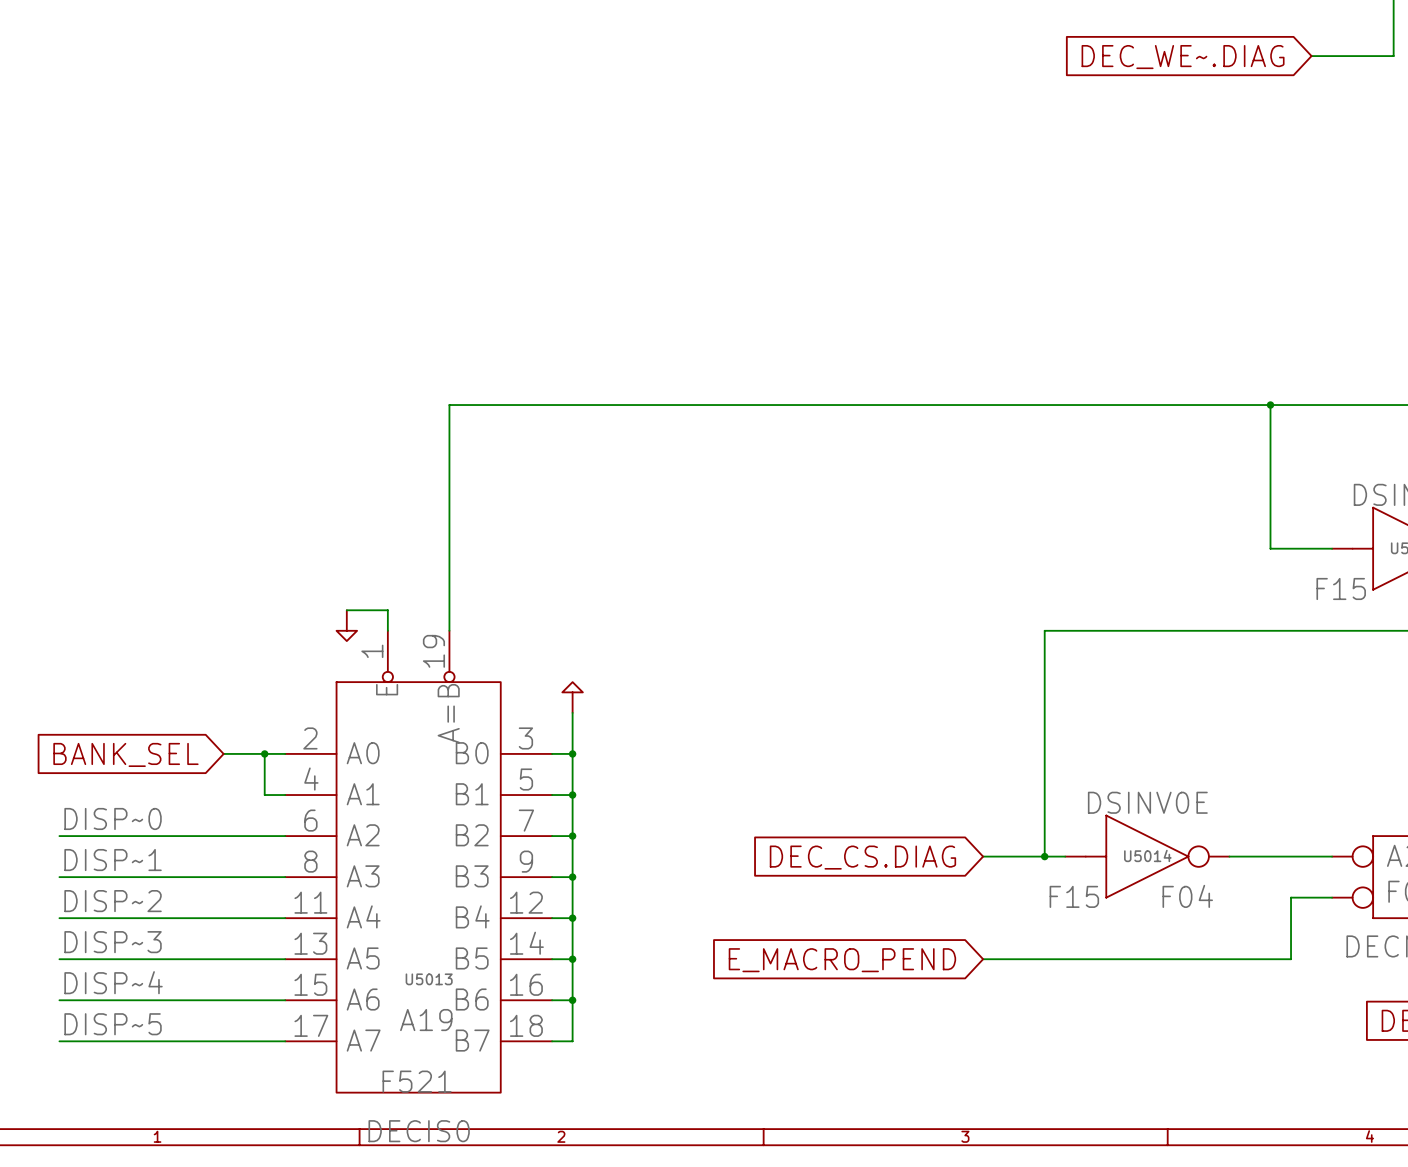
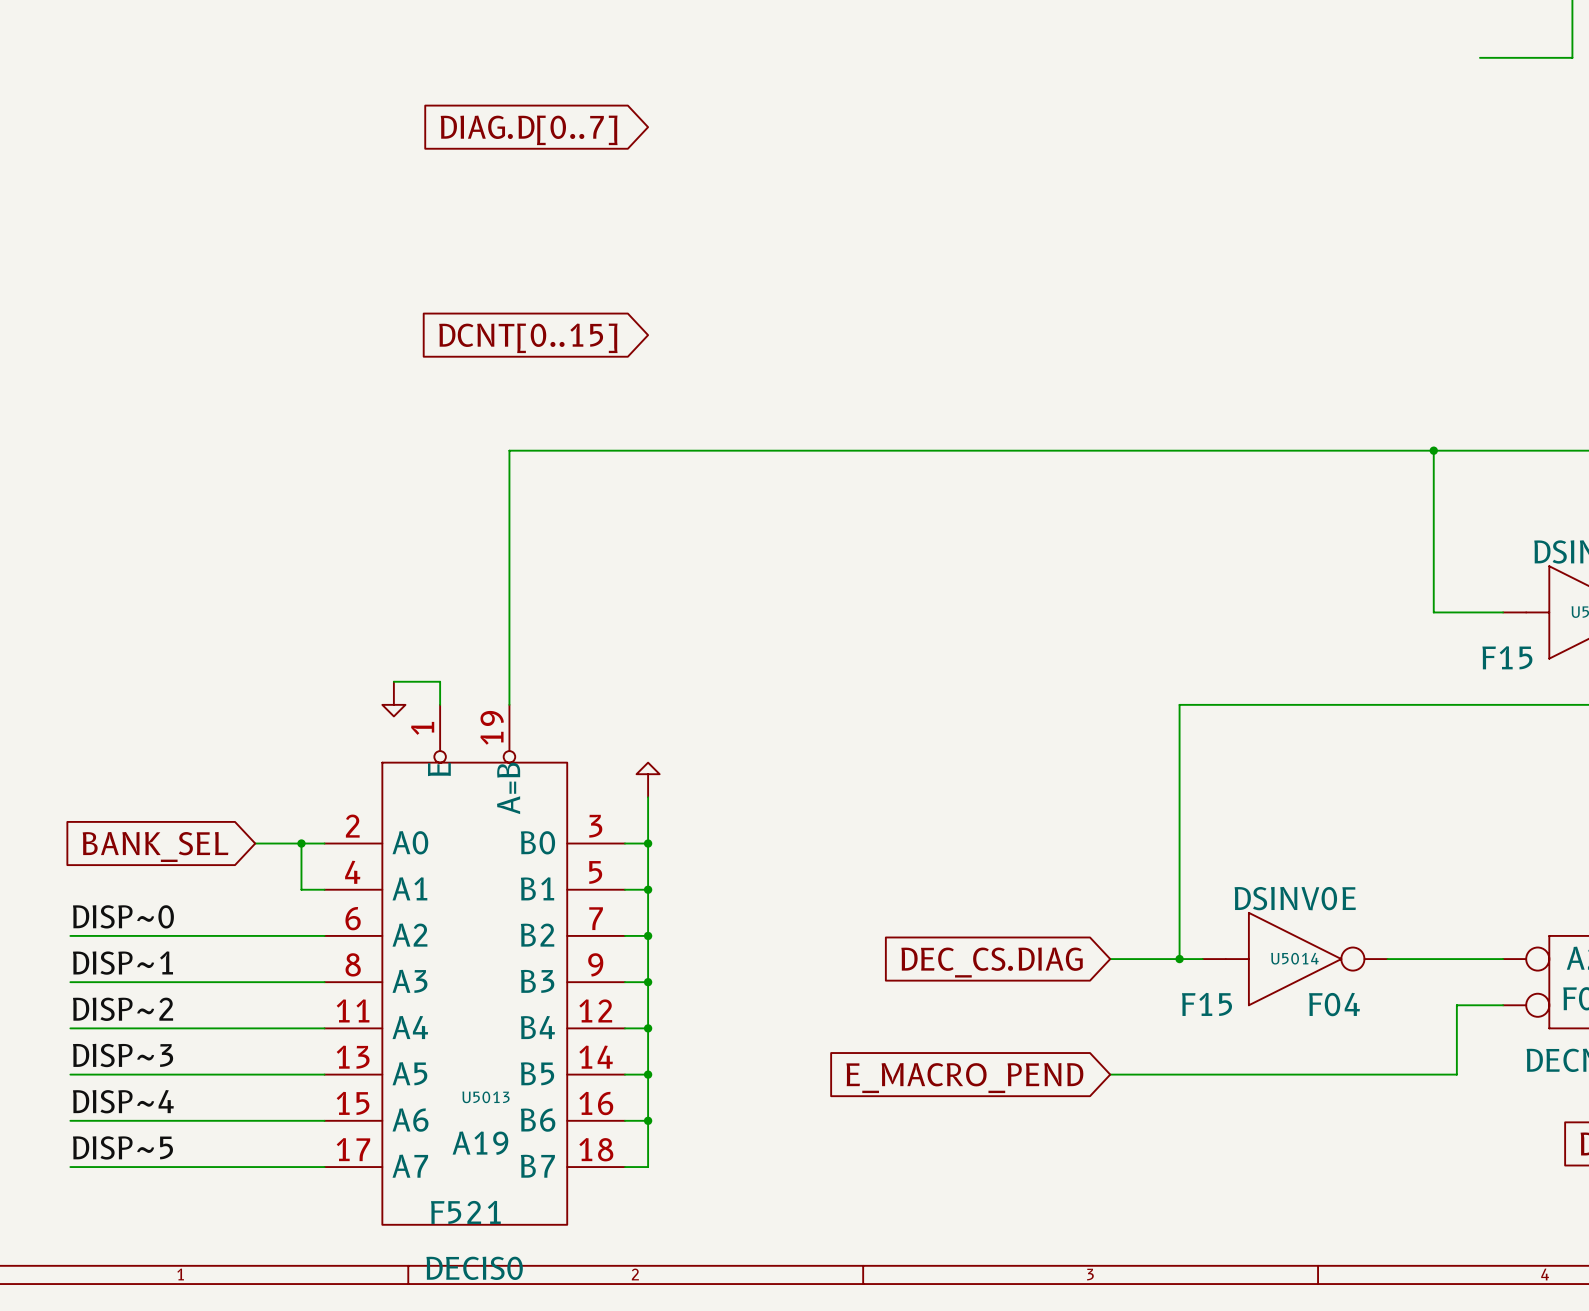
global label: DEC_WE~.DIAG (1183, 57) -> none
global label: none -> DIAG.D[0..7] (529, 130)
global label: none -> DCNT[0..15] (528, 338)

